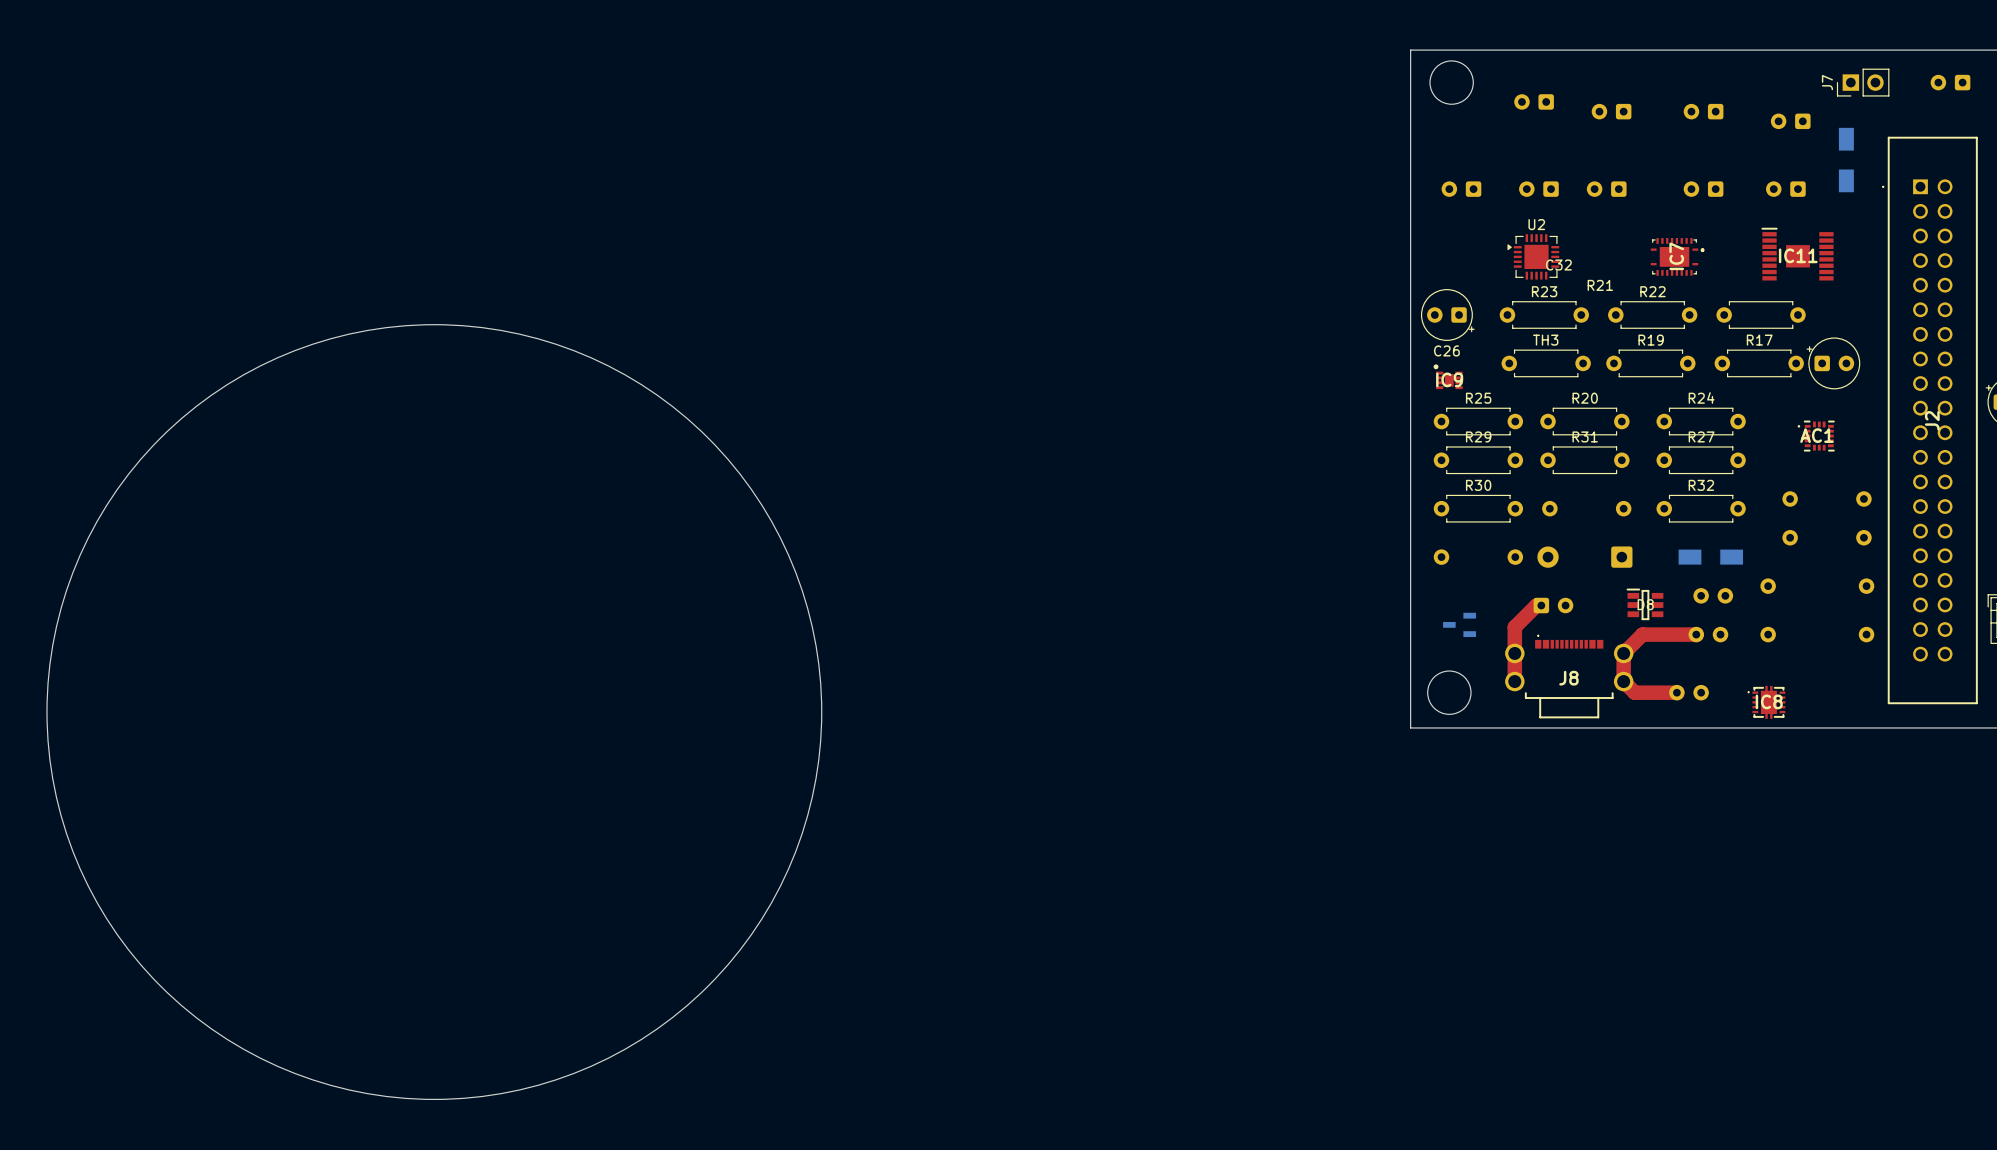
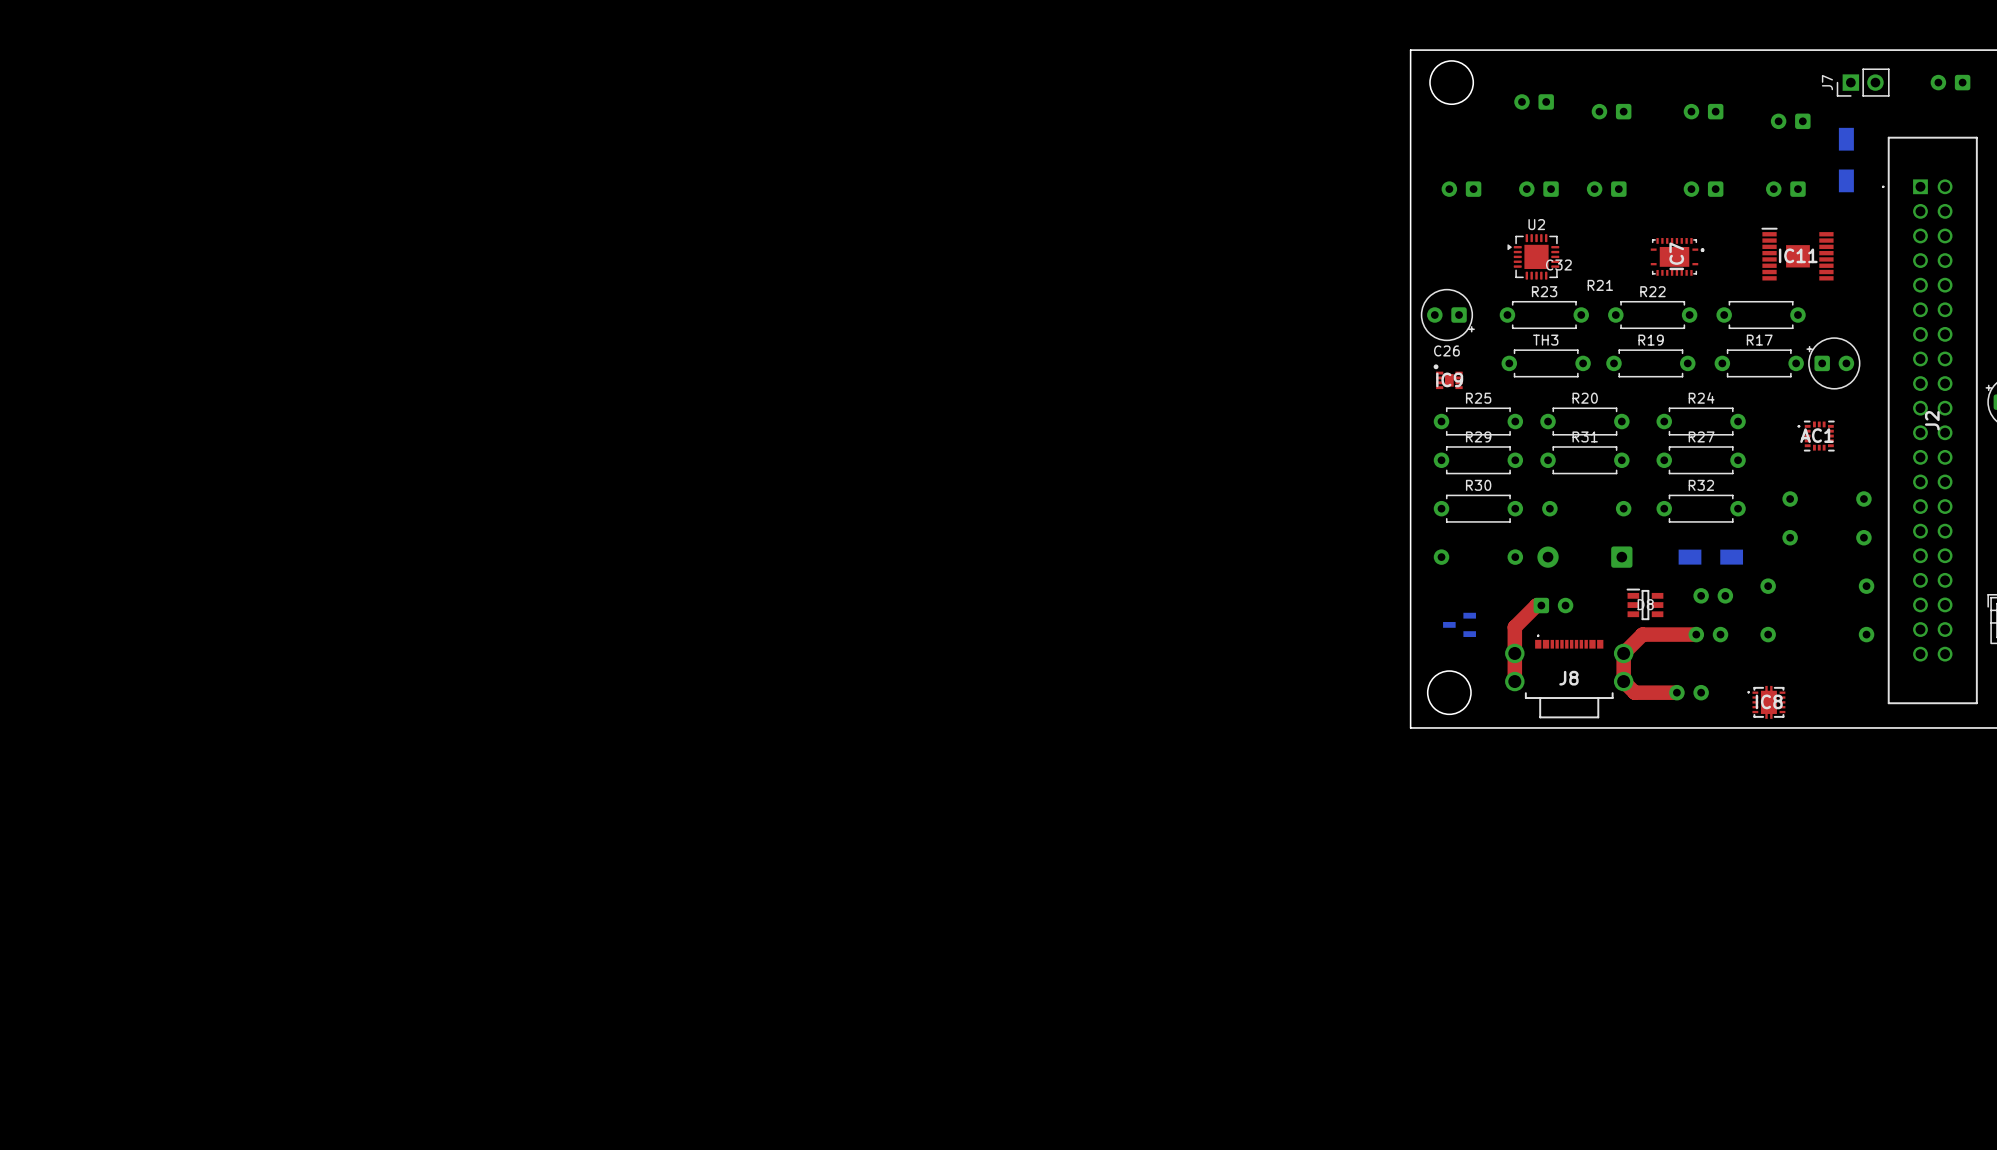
round board edge: [46, 324, 822, 1100] -> none

